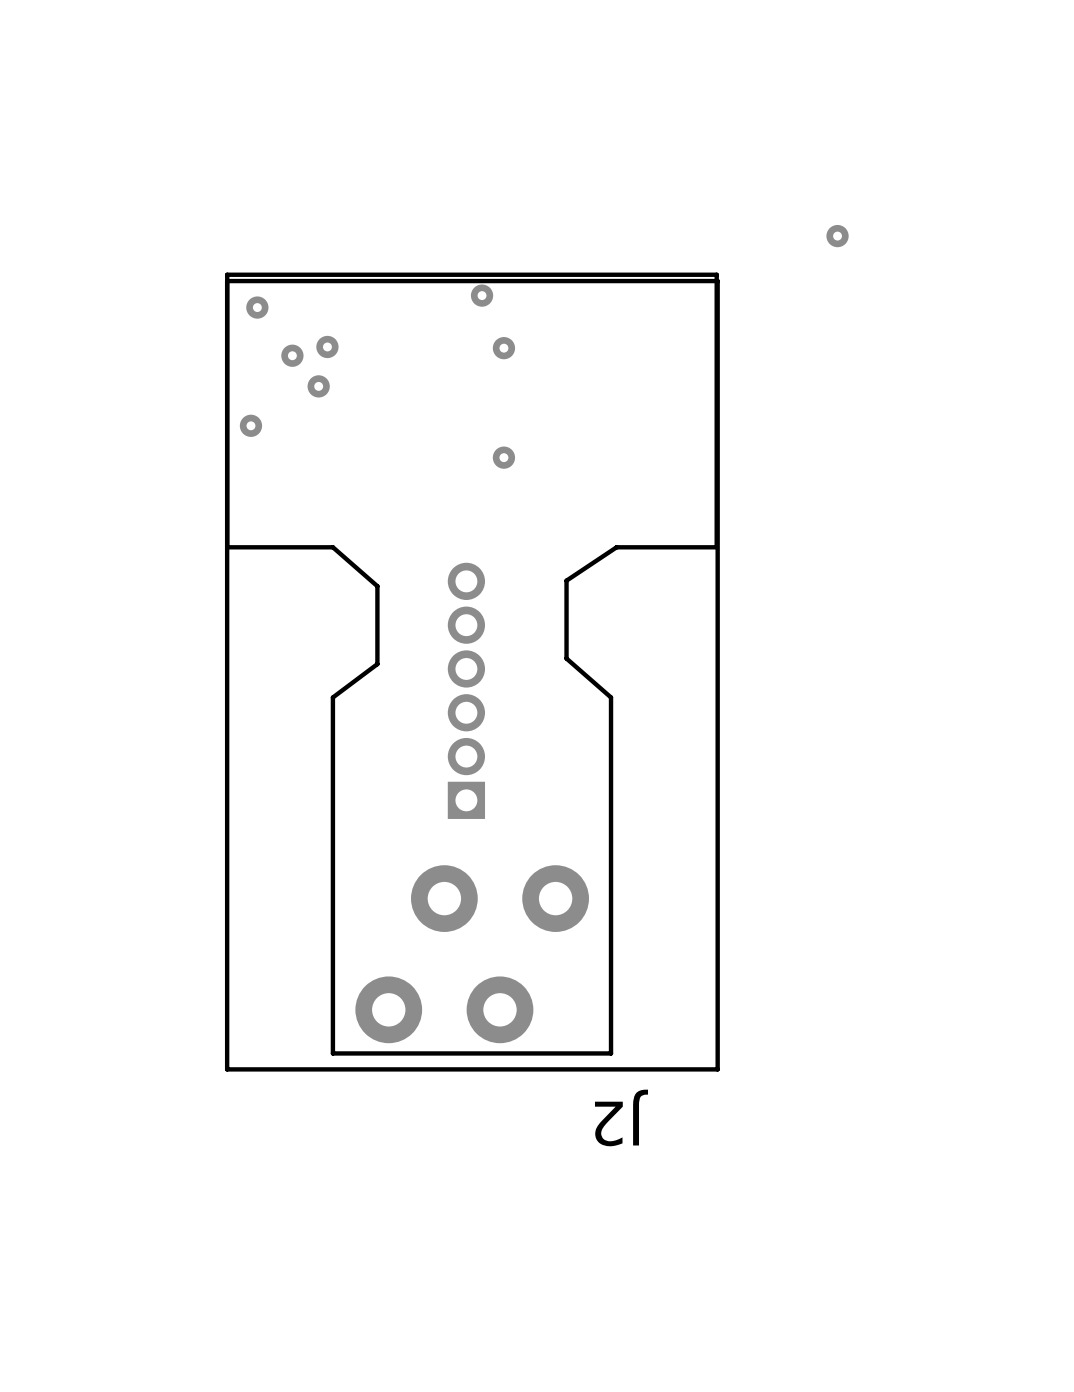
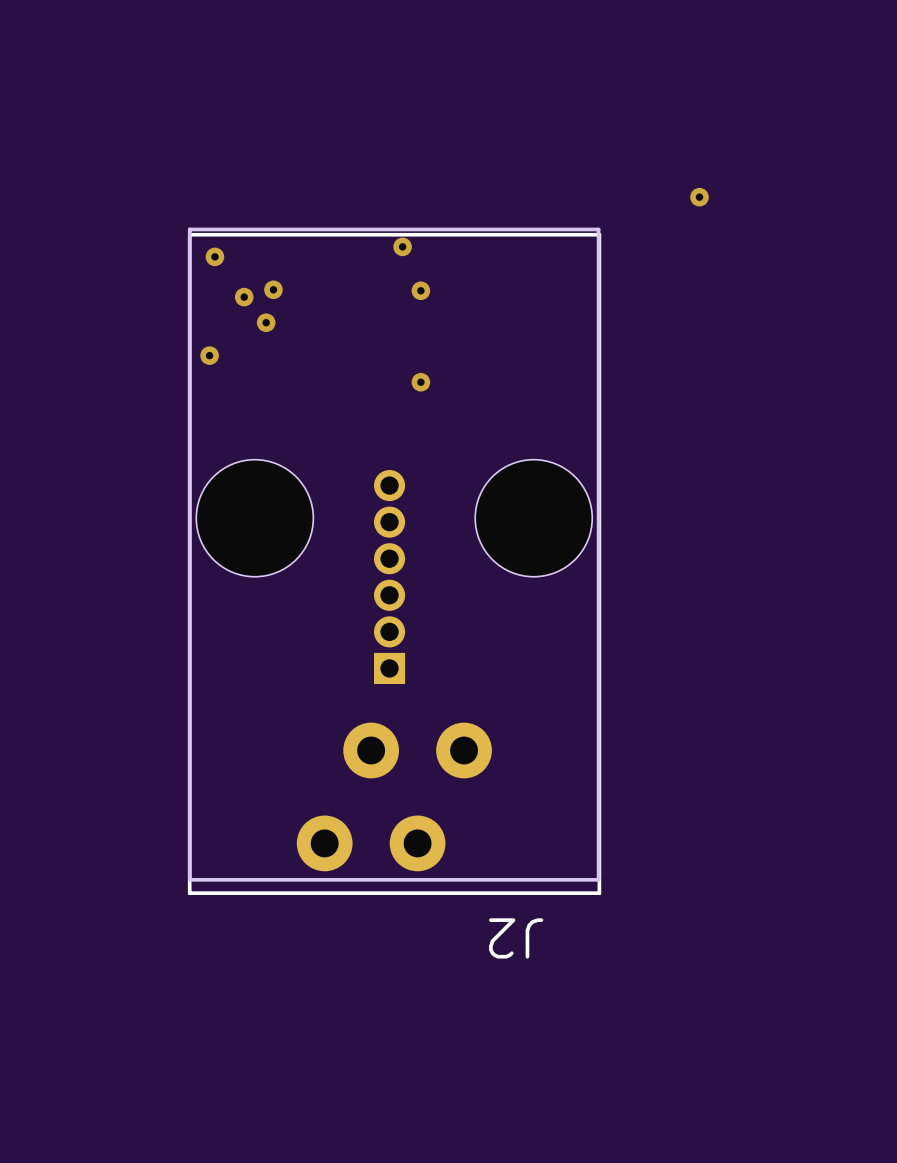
J2 footprint: [224, 278, 720, 1072] -> [187, 232, 602, 895]
board edge: (227, 547) (332, 547) (377, 586) (377, 664) (332, 697) (332, 1053) -> (189, 457) (189, 879) (278, 879)
board edge: (716, 547) (616, 547) (566, 580) (566, 658) (611, 697) (611, 1053) -> (598, 457) (598, 879) (510, 879)

